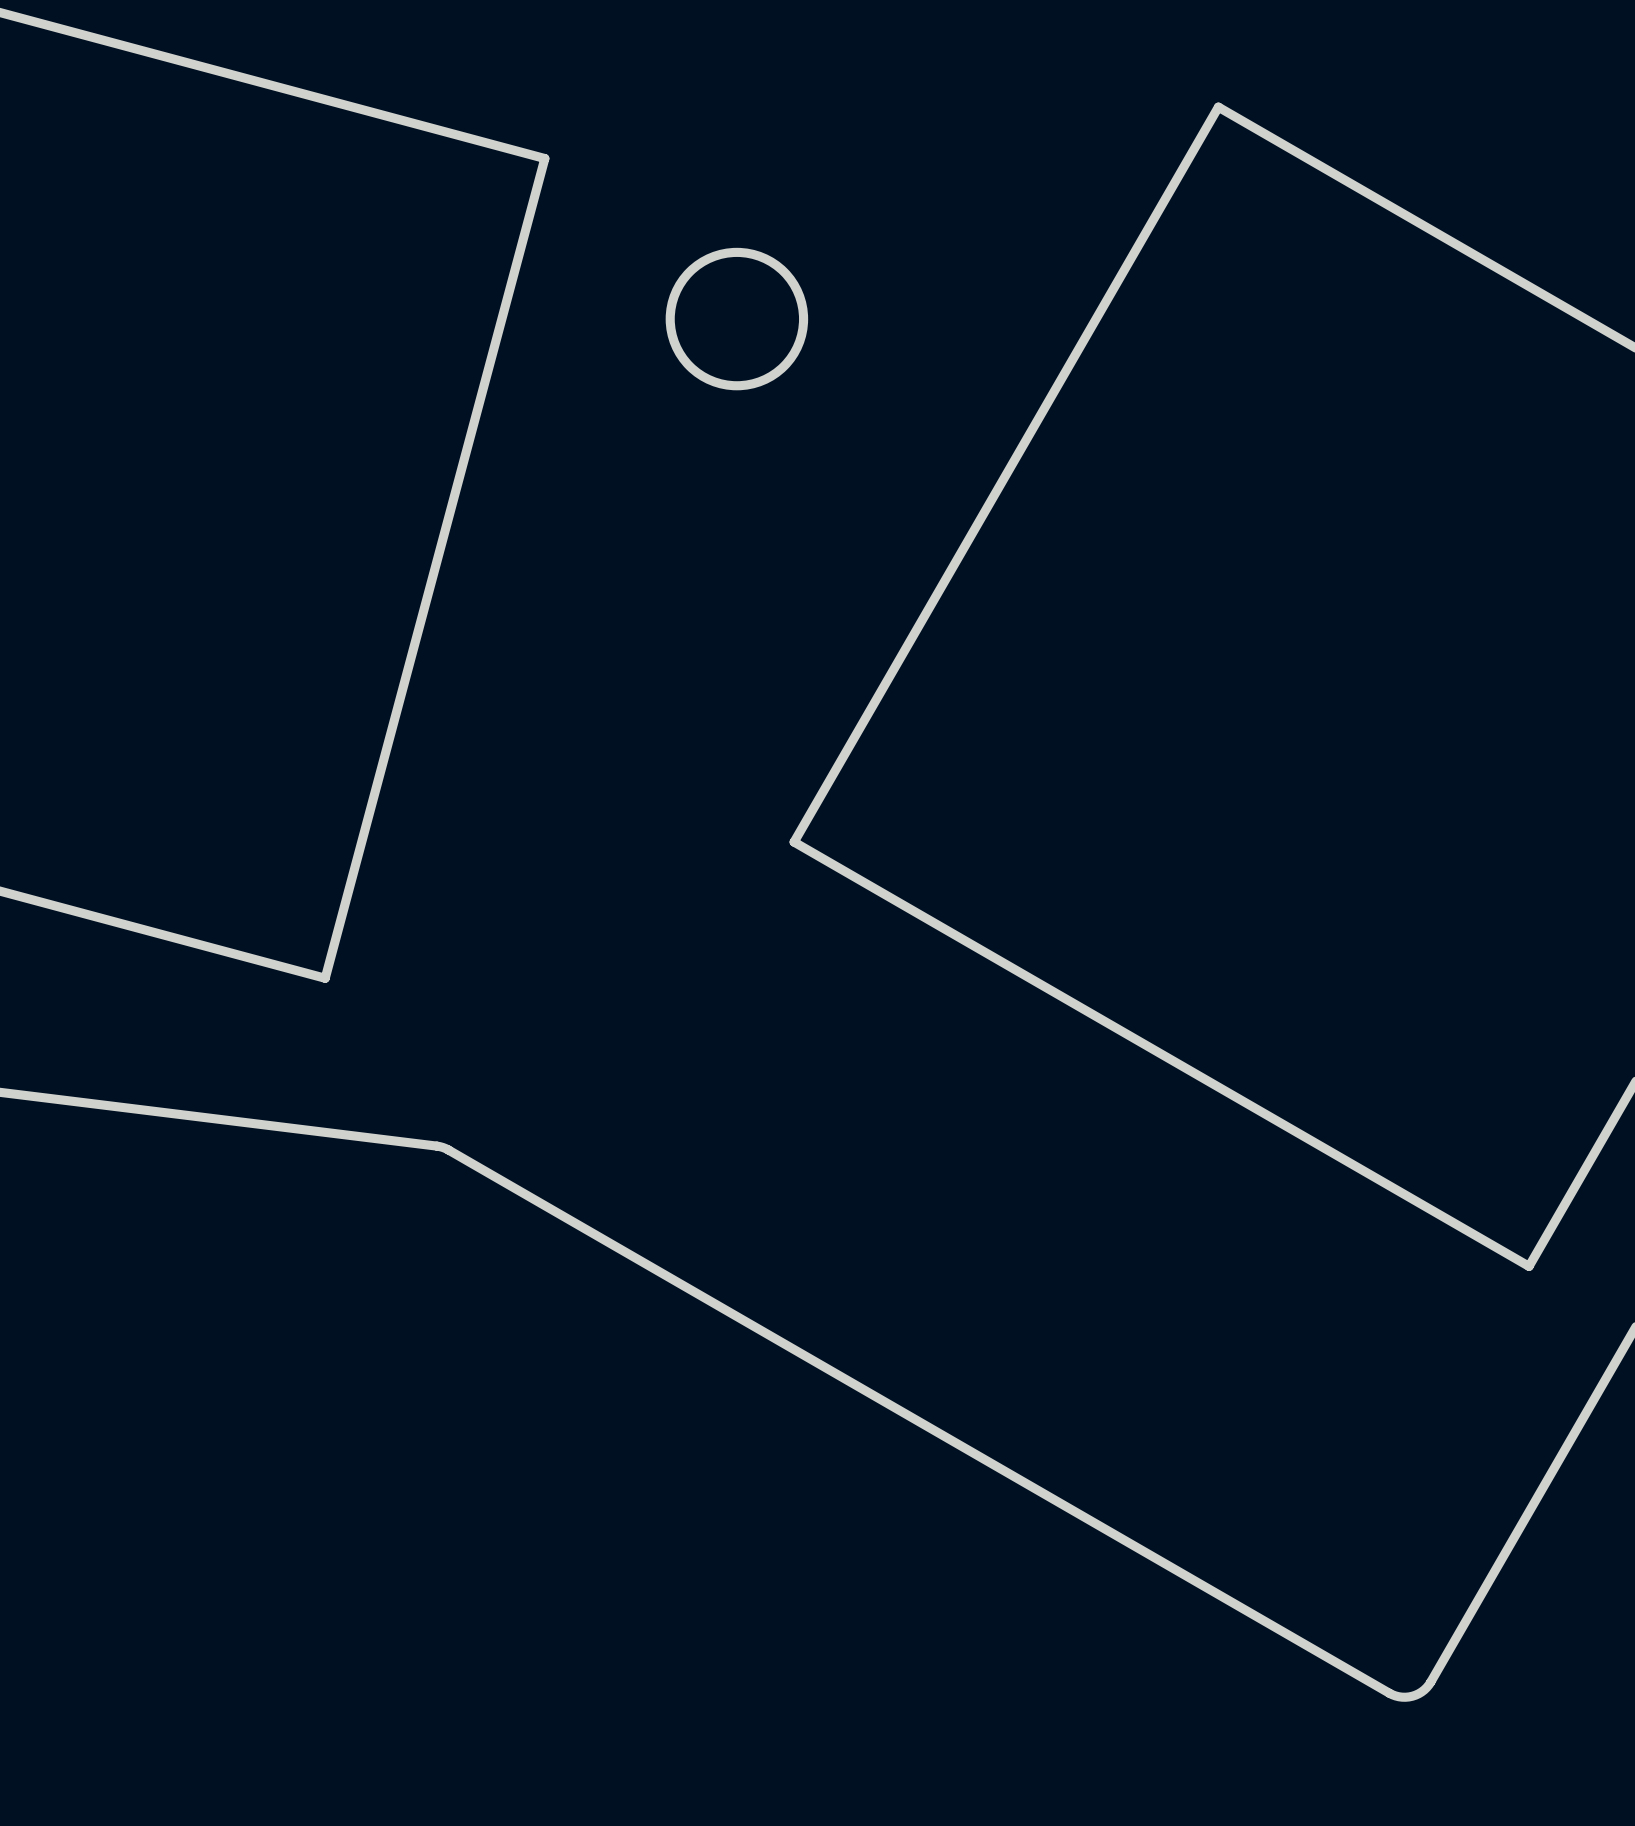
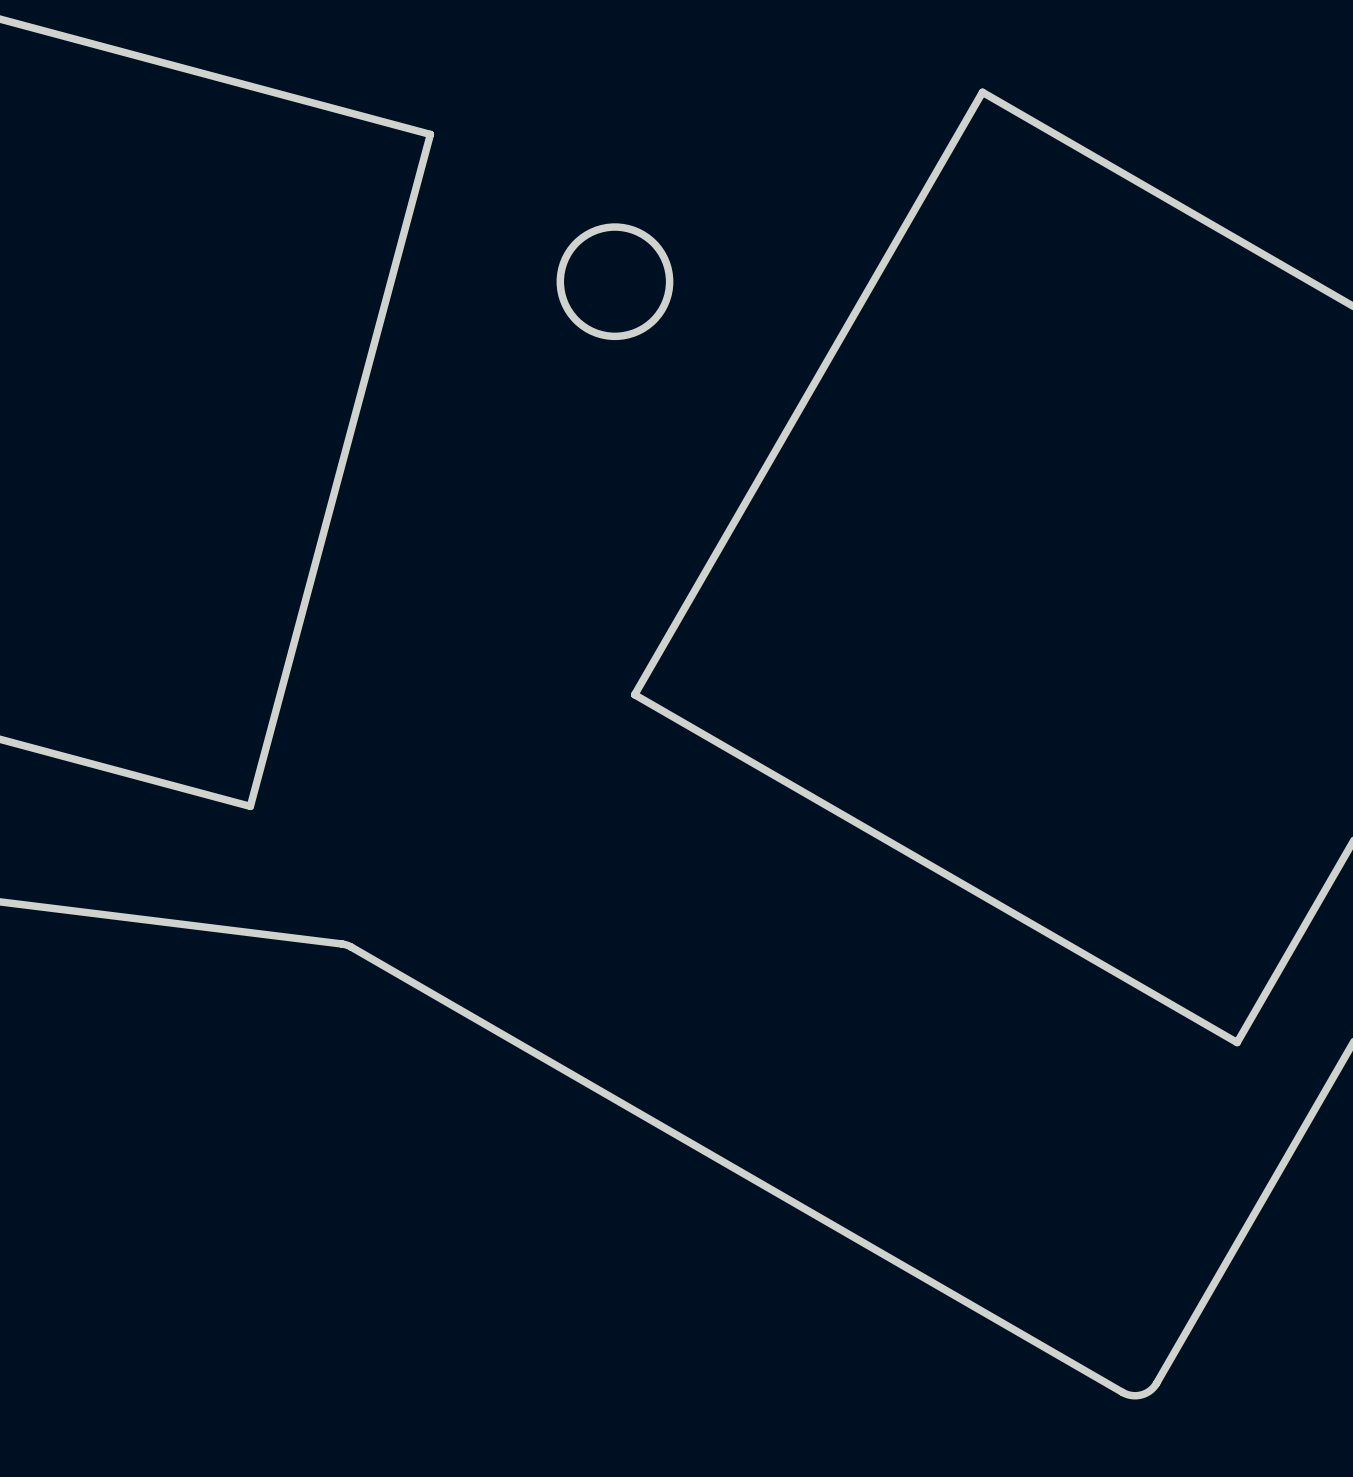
round board edge position: (736, 319) -> (614, 281)

